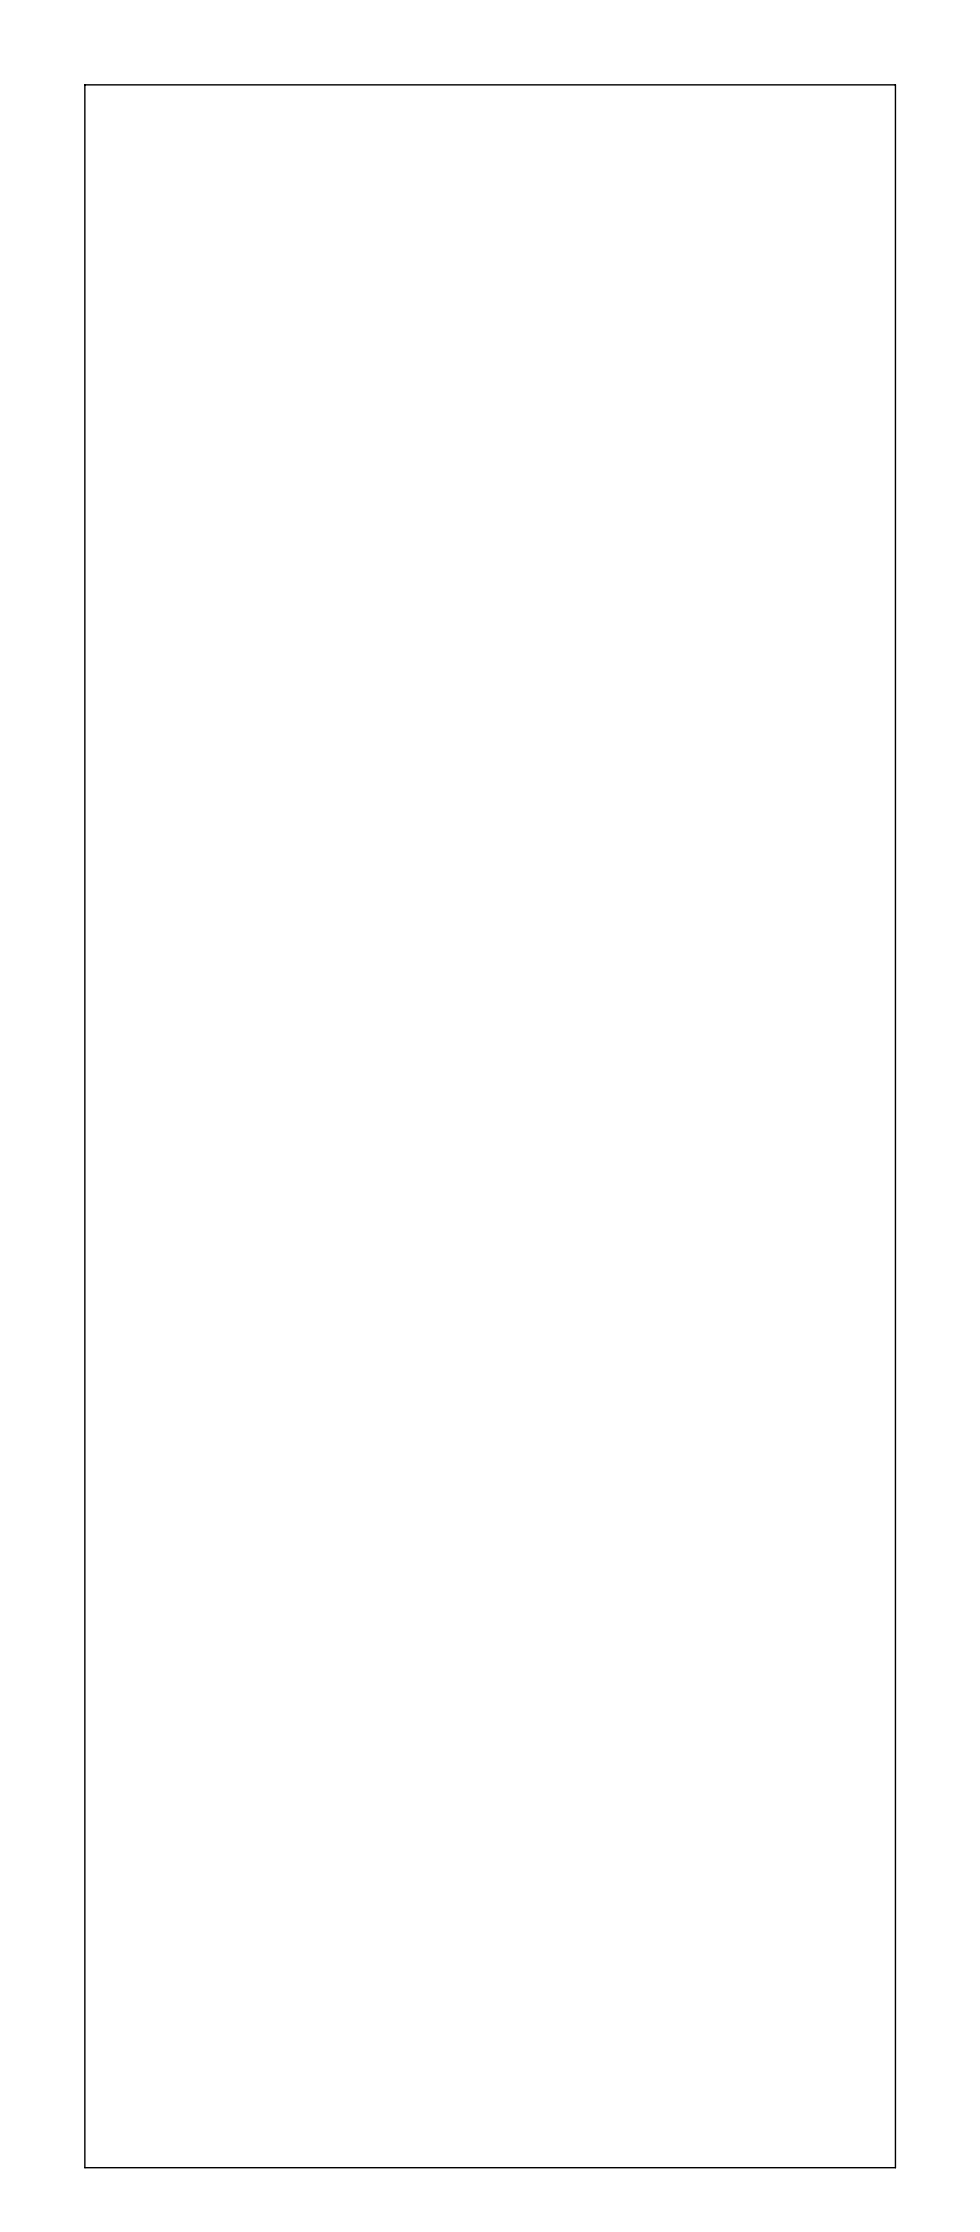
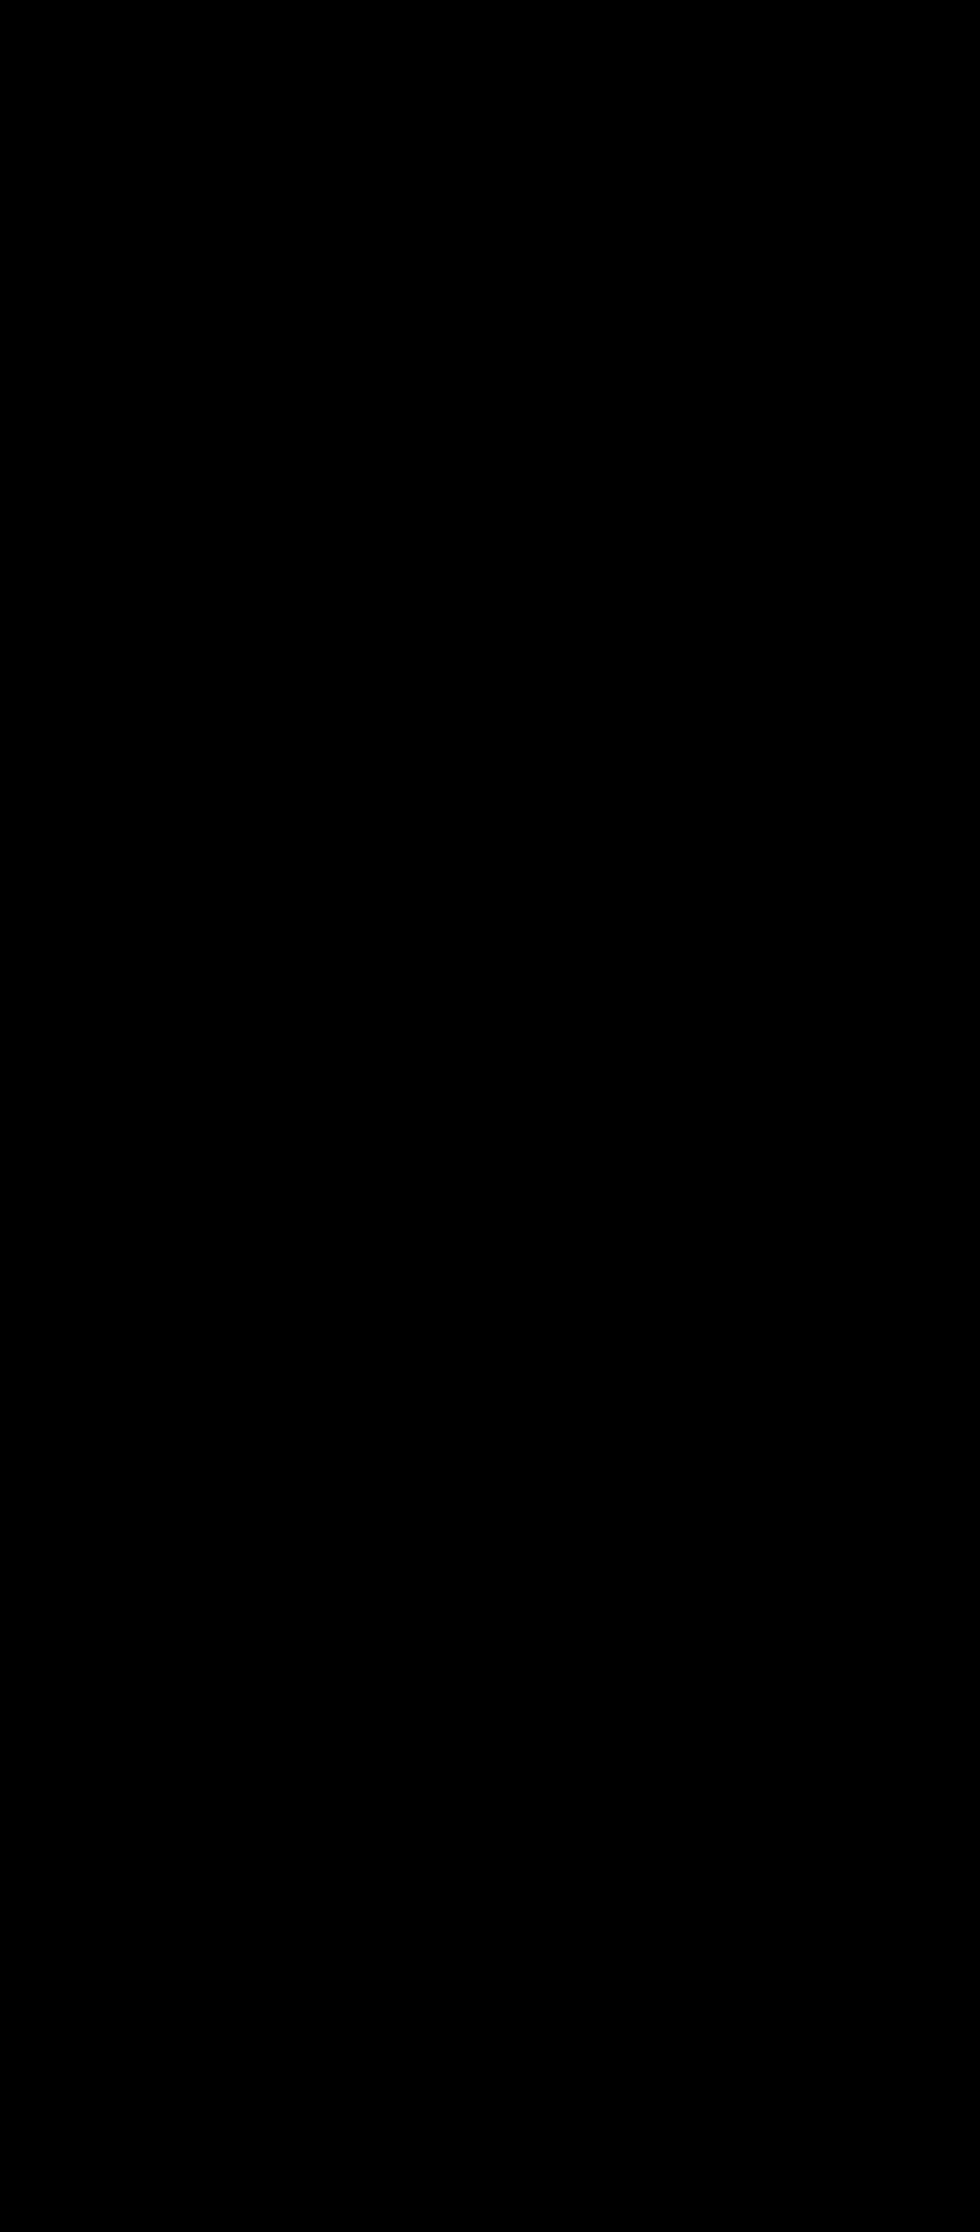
board edge: (84, 84) (895, 84) (895, 2167) (84, 2167) (84, 84) -> none

